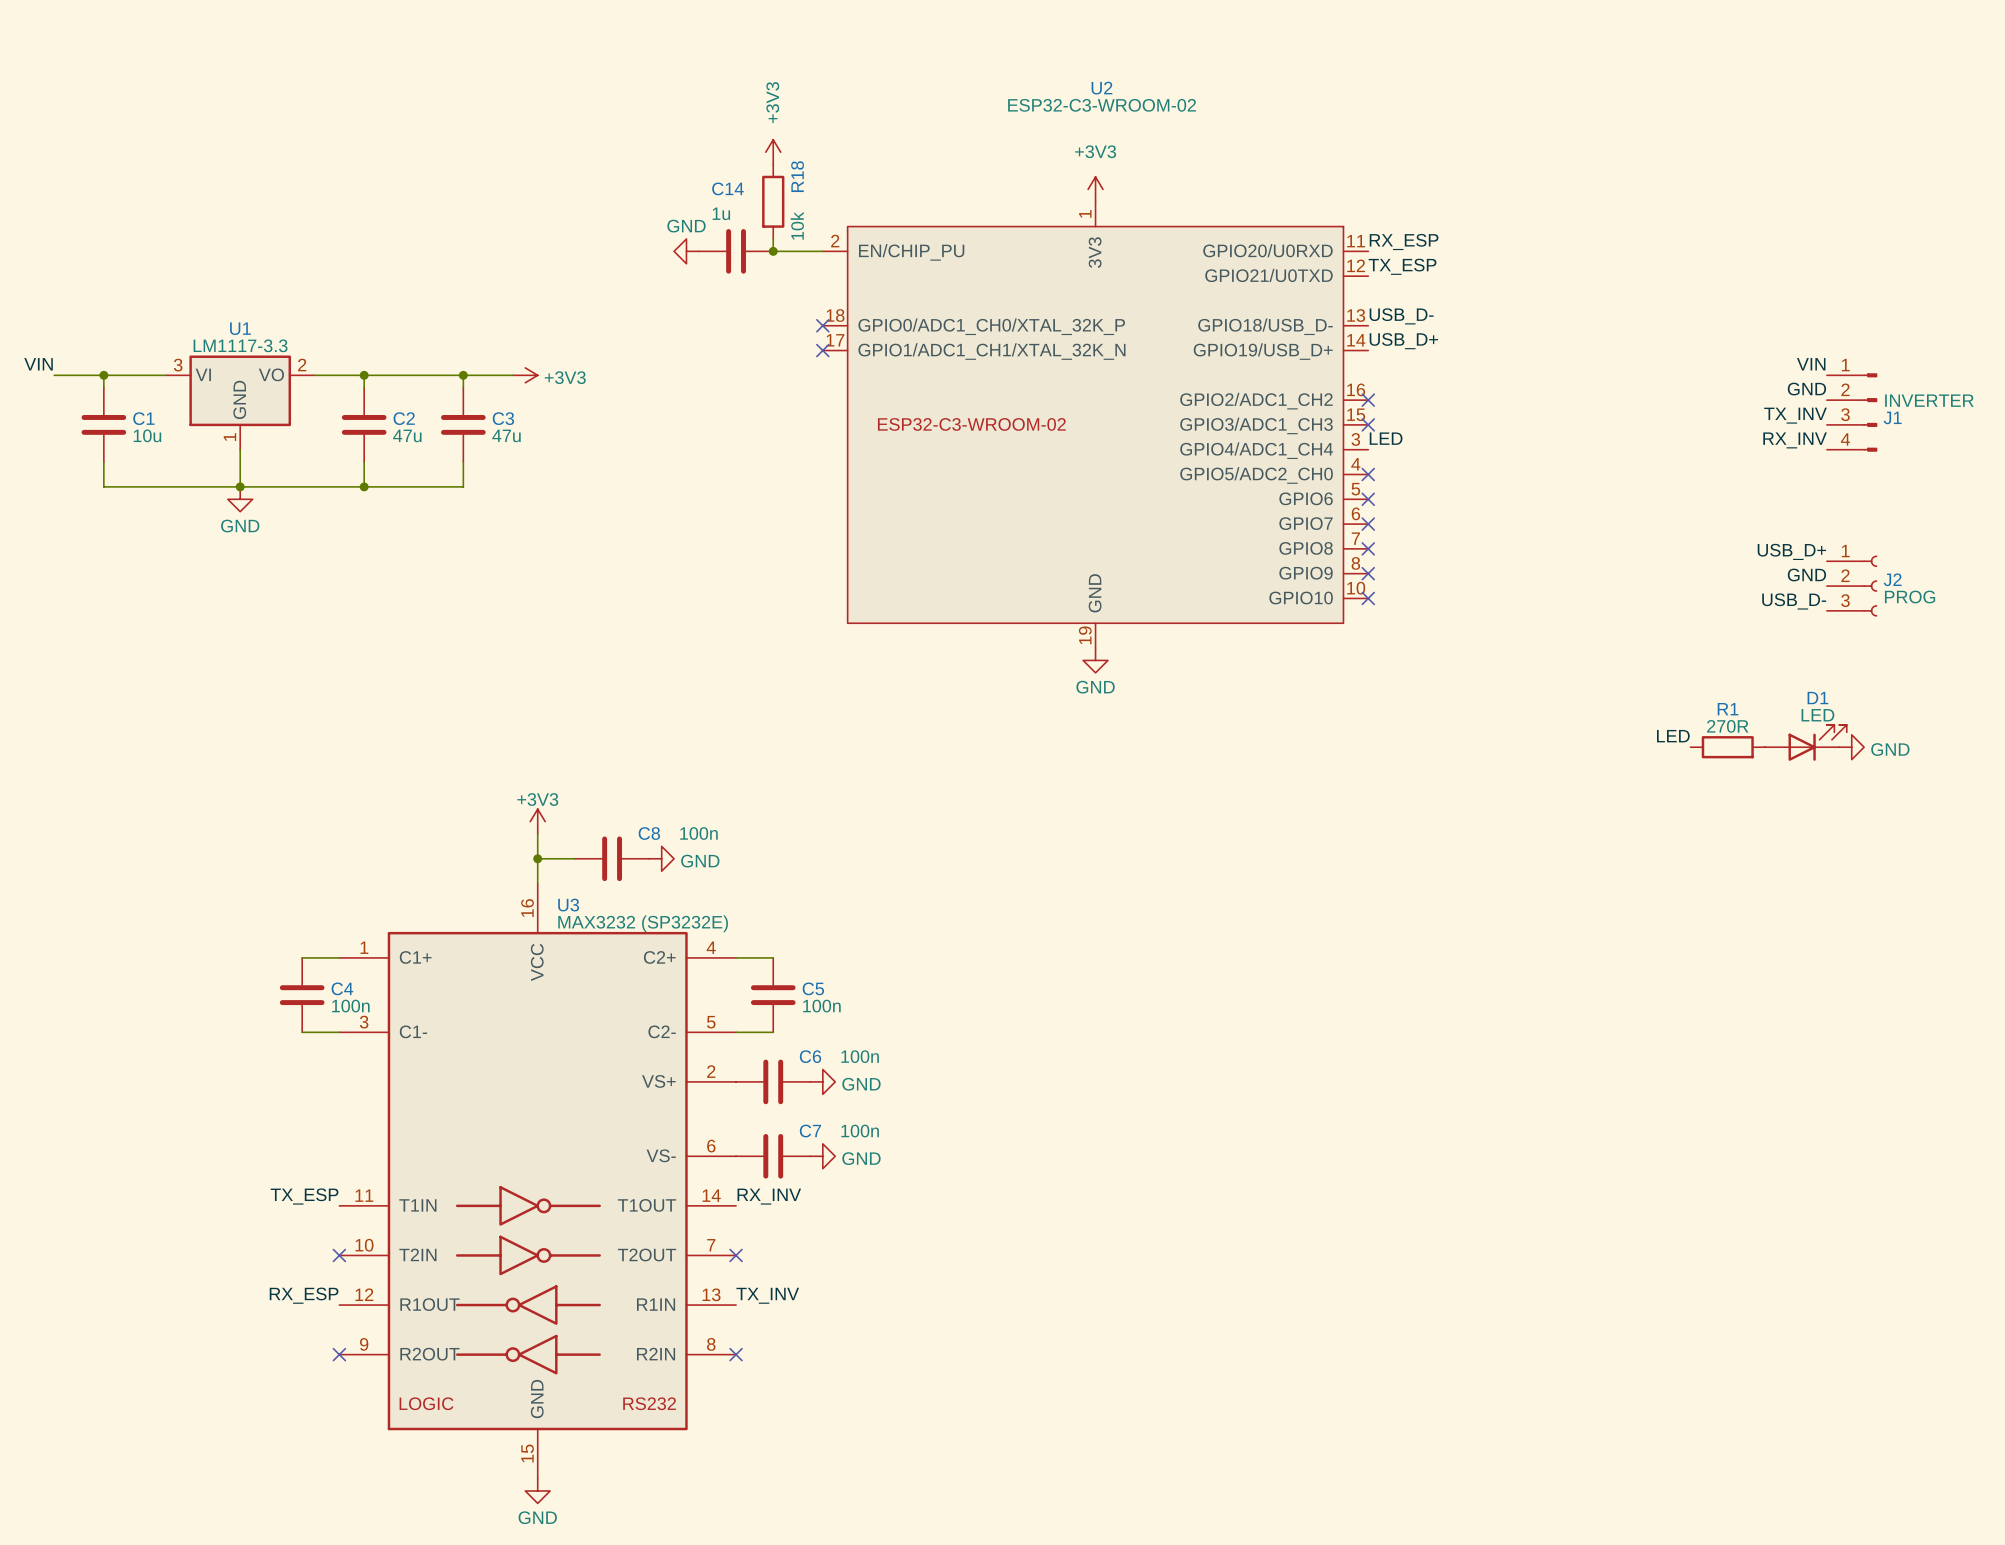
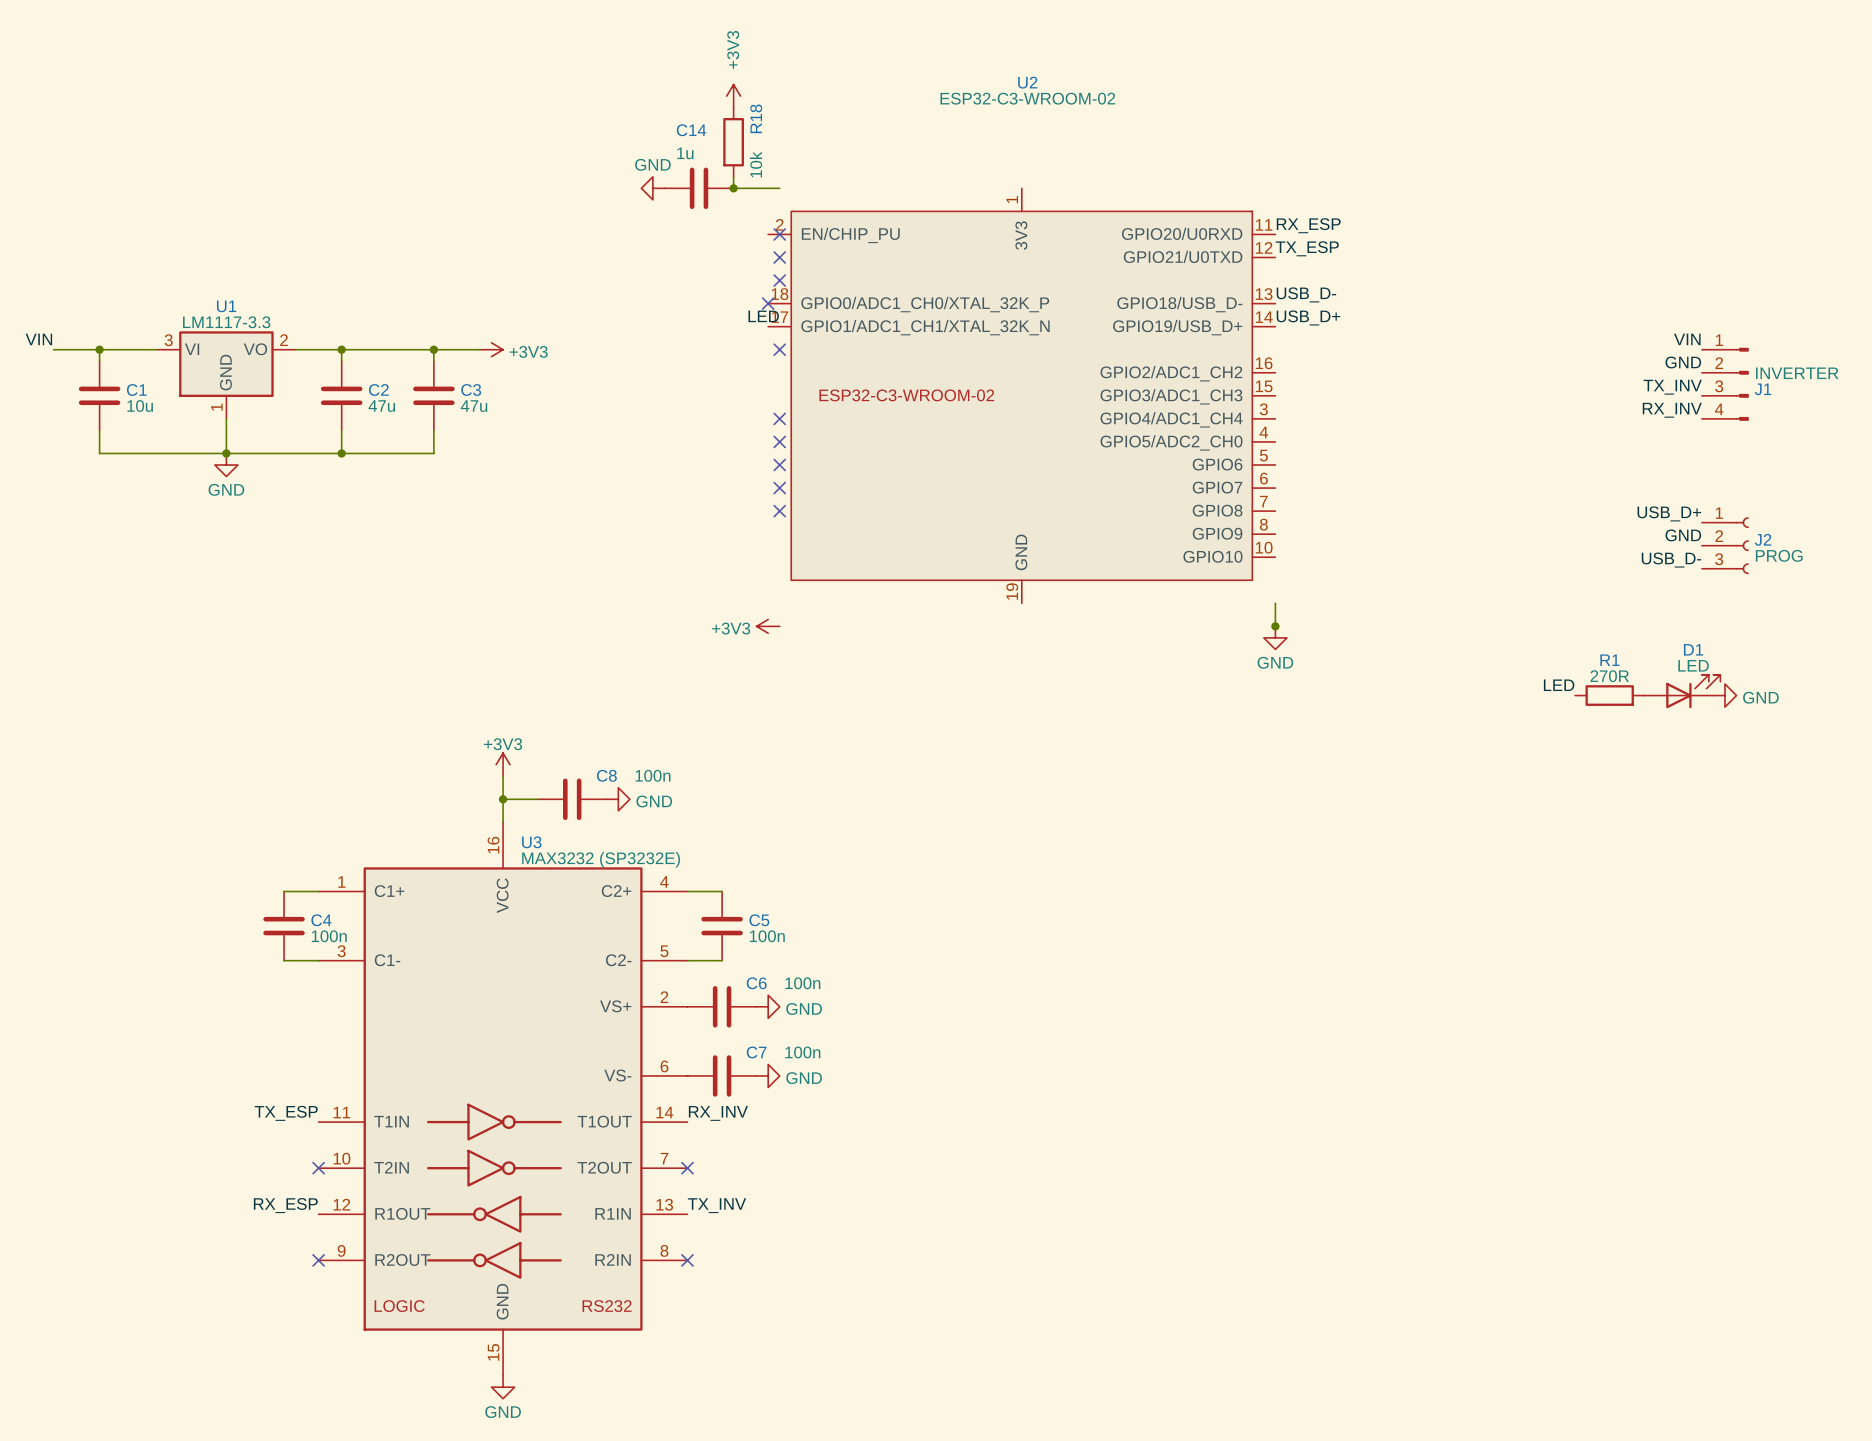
power symbol position: +3V3 (773, 152) -> +3V3 (733, 96)
power symbol: +3V3 (1095, 189) -> none
R18 position: (773, 201) -> (733, 142)
wire: (773, 238) (773, 251) (822, 251) -> (733, 176) (733, 188) (779, 188)
power symbol position: GND (686, 251) -> GND (652, 188)
C14 position: (736, 251) -> (699, 188)
junction position: (773, 251) -> (733, 188)
no-connect mark: none -> (779, 234)
no-connect mark: none -> (779, 257)
no-connect mark: none -> (779, 280)
label: none -> LED (763, 316)
no-connect mark: (822, 350) -> none
no-connect mark: none -> (779, 349)
no-connect mark: (1368, 400) -> none
no-connect mark: (1368, 424) -> none
label: LED (1386, 438) -> none
no-connect mark: none -> (779, 418)
no-connect mark: none -> (779, 441)
no-connect mark: (1368, 474) -> none
no-connect mark: none -> (779, 465)
no-connect mark: (1368, 499) -> none
no-connect mark: none -> (779, 488)
no-connect mark: (1368, 524) -> none
no-connect mark: none -> (779, 511)
no-connect mark: (1368, 548) -> none
no-connect mark: (1368, 573) -> none
no-connect mark: (1368, 598) -> none
wire: none -> (1275, 603) (1275, 626)
power symbol: GND (1095, 660) -> none
power symbol: none -> +3V3 (768, 626)
junction: none -> (1275, 626)
power symbol: none -> GND (1275, 637)

